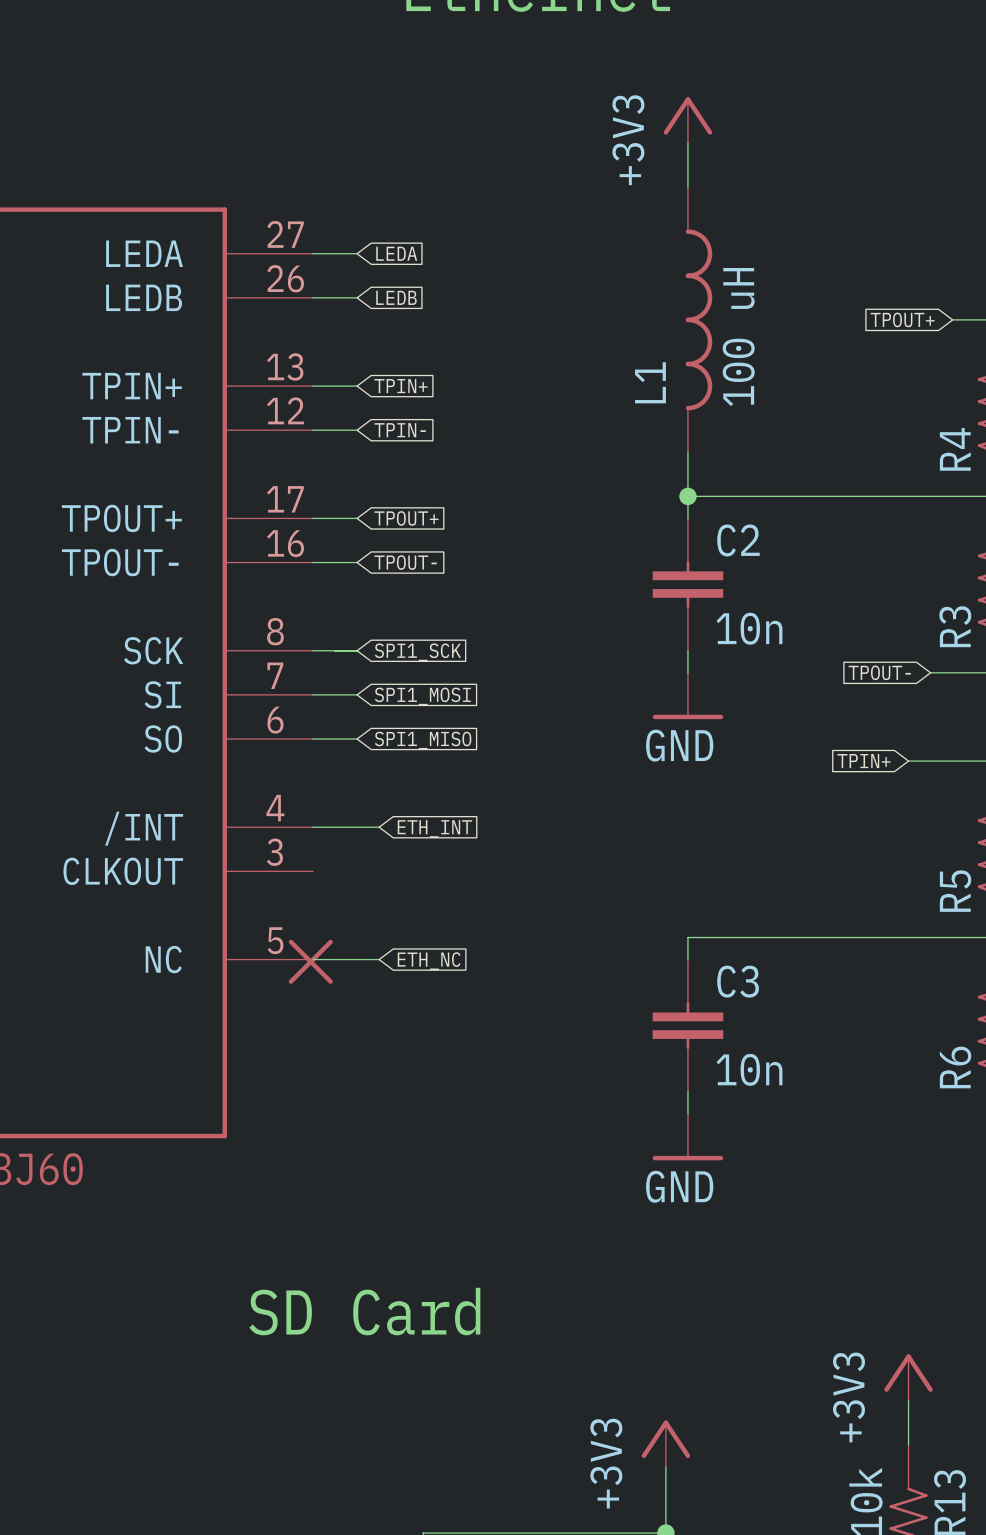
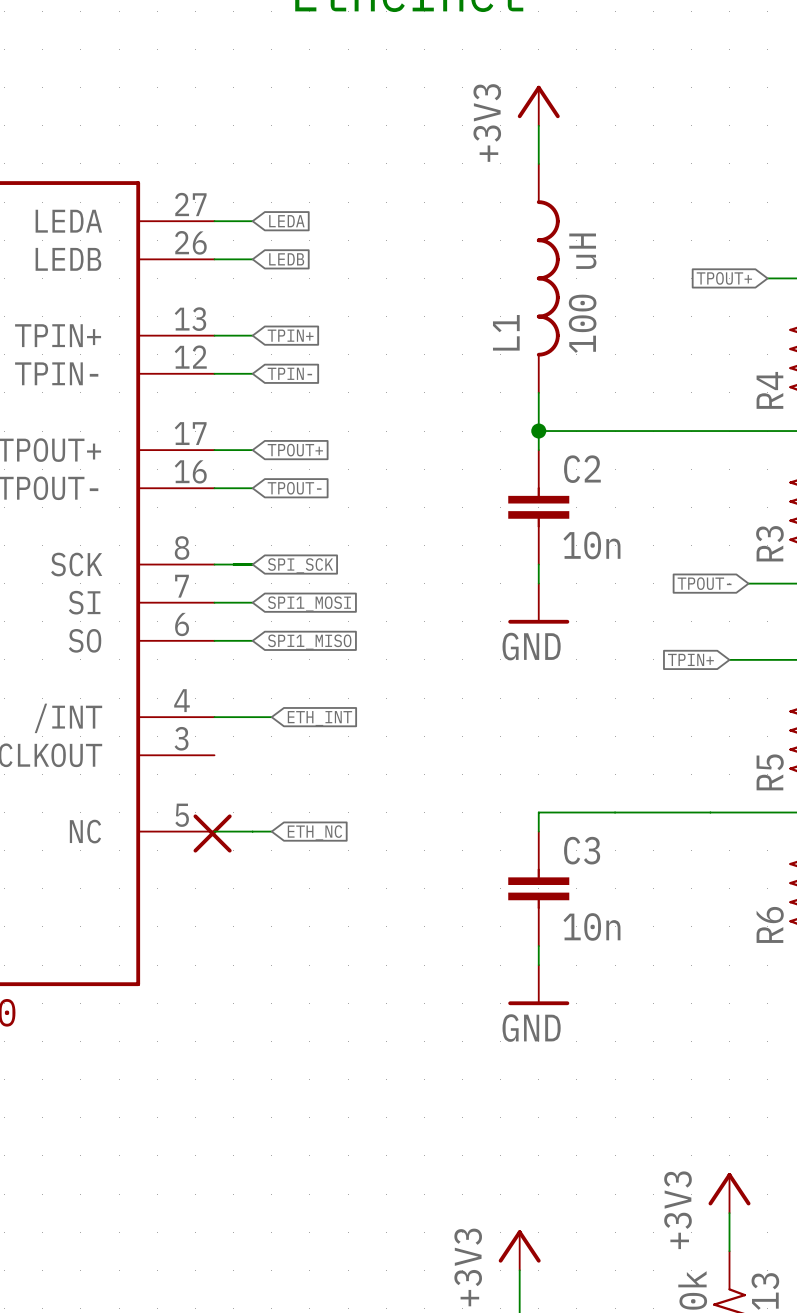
global label: SPI1_SCK (417, 652) -> SPI_SCK (300, 565)
text: SD Card (364, 1311) -> none

